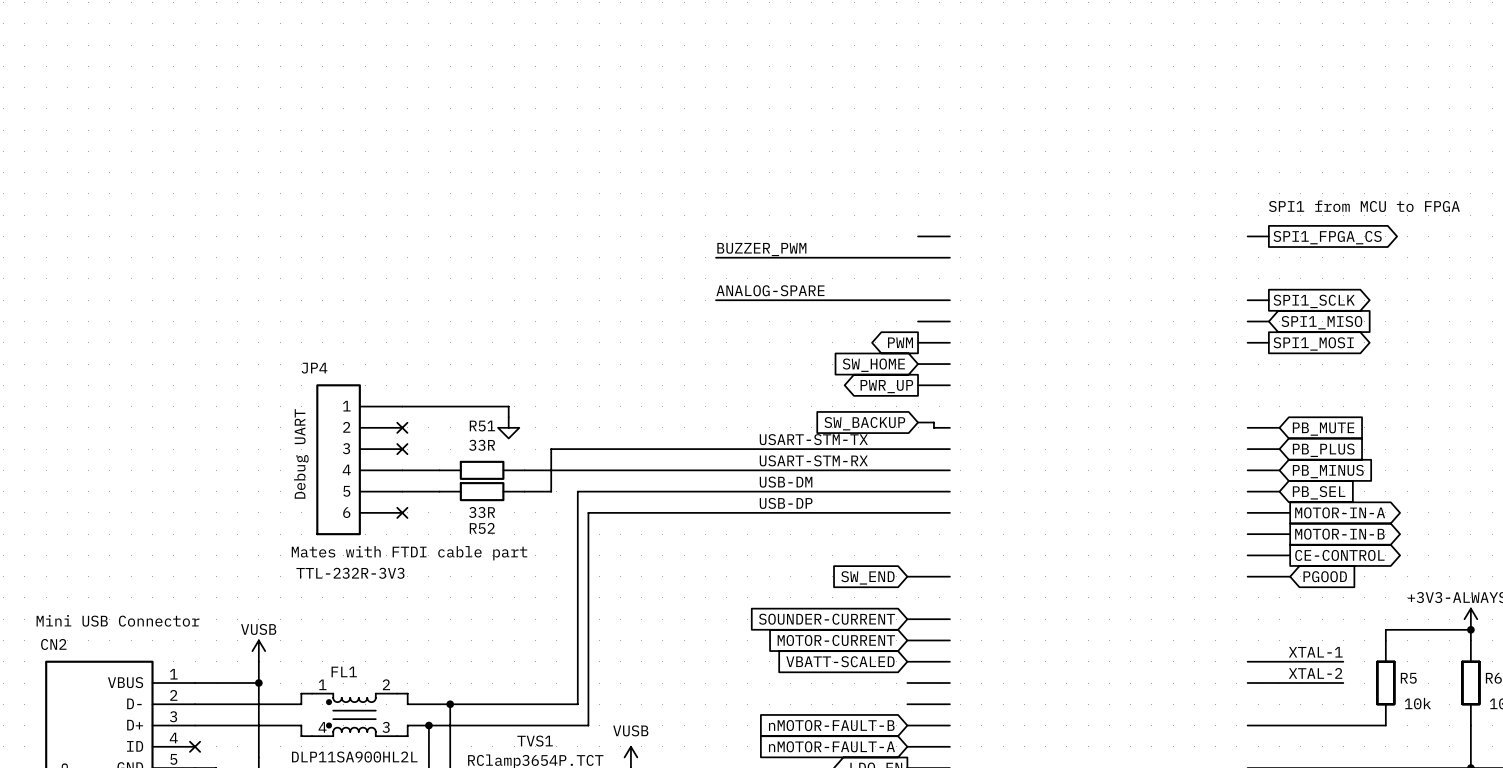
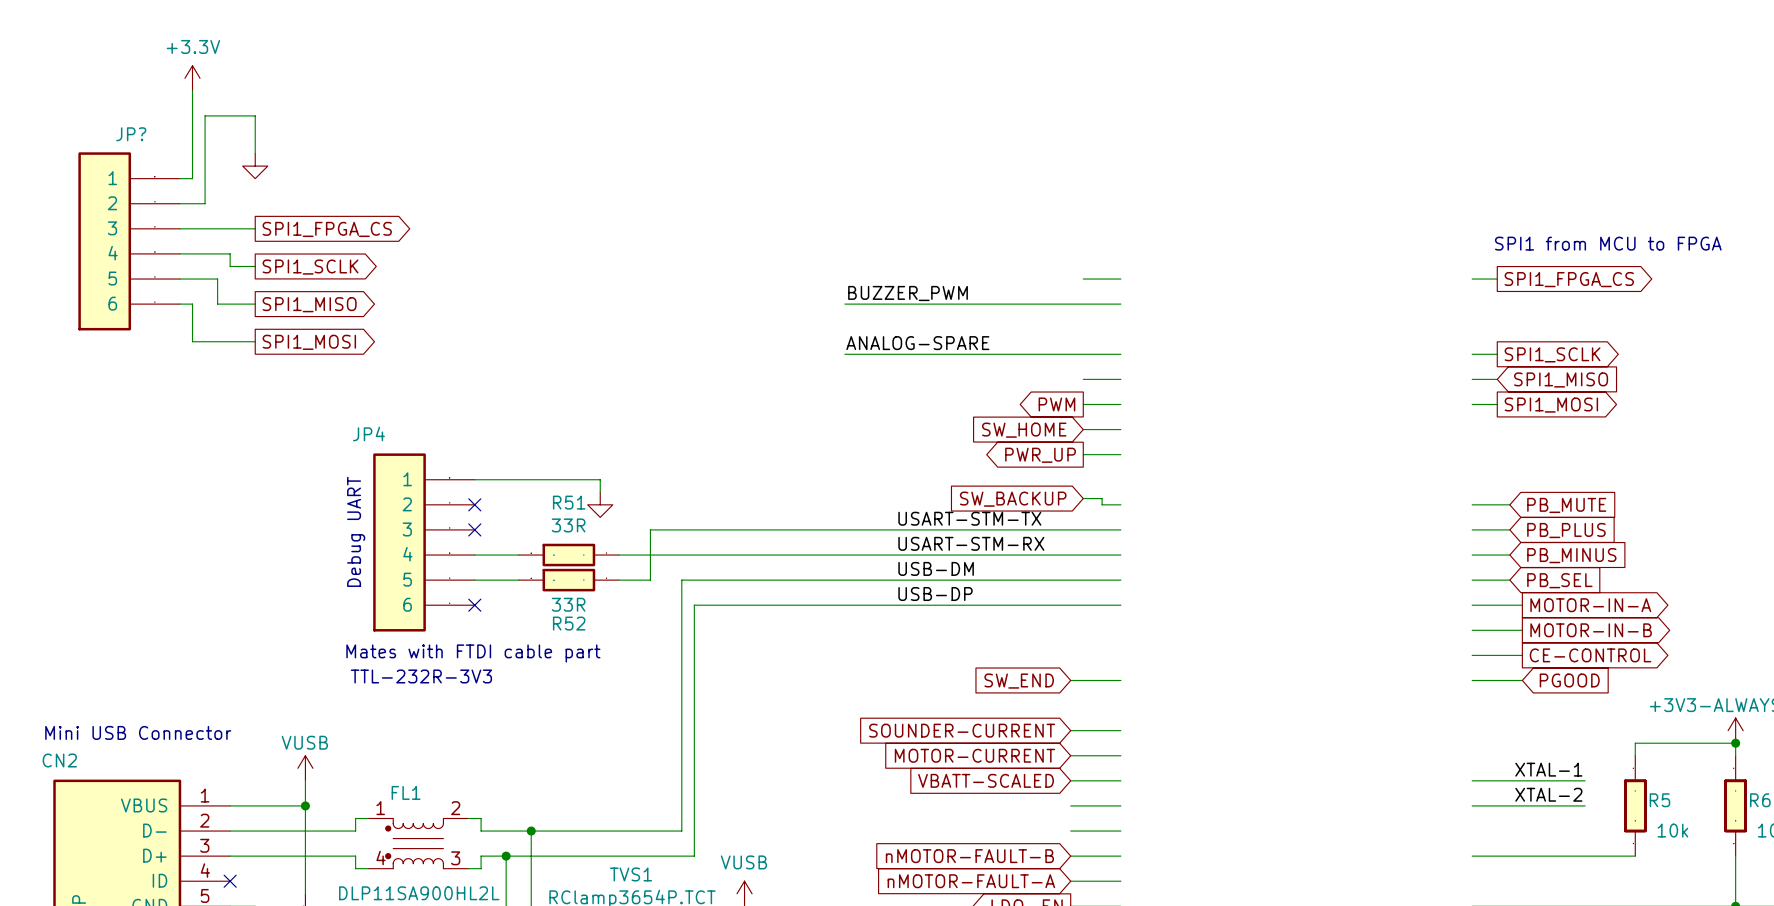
power symbol: none -> +3.3V (192, 78)
wire: none -> (192, 90) (192, 178) (179, 178)
wire: none -> (255, 153) (255, 115) (205, 115) (205, 203) (179, 203)
power symbol: none -> (255, 166)
wire: none -> (179, 228) (255, 228)
global label: none -> SPI1_FPGA_CS (327, 229)
JP?: none -> (129, 241)
wire: none -> (179, 253) (230, 253) (230, 266) (255, 266)
global label: none -> SPI1_SCLK (310, 267)
wire: none -> (179, 279) (217, 279) (217, 304) (255, 304)
wire: none -> (179, 304) (192, 304) (192, 341) (255, 341)
global label: none -> SPI1_MISO (309, 304)
global label: none -> SPI1_MOSI (309, 342)

